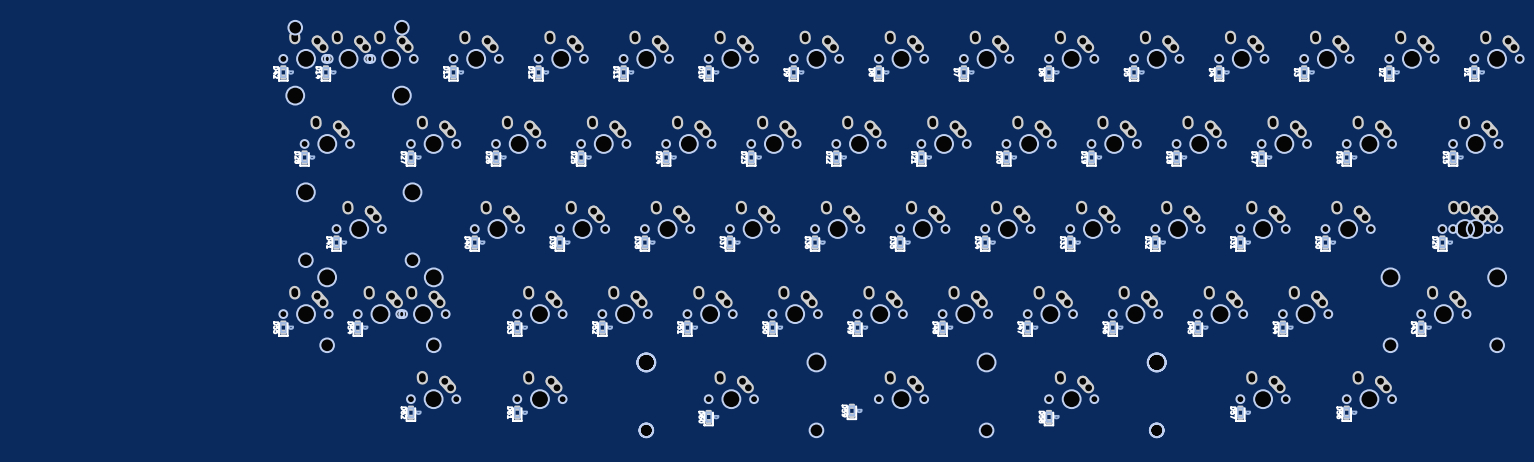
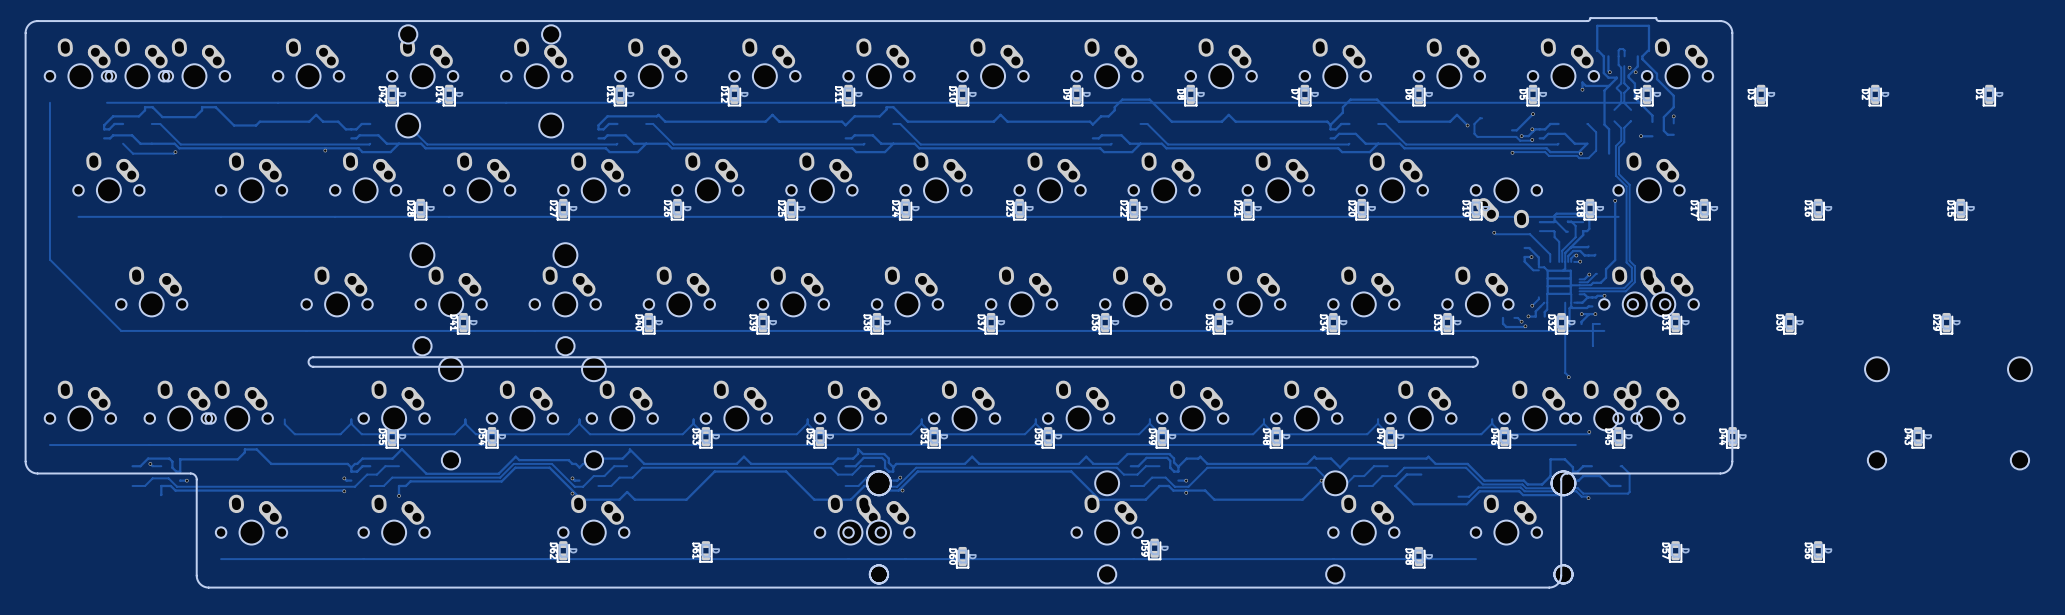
drawing: none -> [24, 17, 1734, 589]
track: none -> (1608, 56) (1609, 72)
track: none -> (1624, 56) (1624, 50) (1620, 49) (1618, 65) (1621, 67) (1621, 83) (1616, 88) (1621, 92) (1621, 103) (1614, 109)
track: none -> (1637, 56) (1637, 66) (1628, 77) (1634, 83) (1634, 98) (1652, 115) (1652, 121)
part: none -> (80, 63)
part: none -> (137, 63)
part: none -> (194, 63)
part: none -> (308, 63)
part: (348, 49) -> none
part: (1326, 49) -> none
part: (1411, 49) -> none
part: (1497, 49) -> none
track: none -> (1624, 66) (1624, 83) (1628, 87) (1624, 92) (1624, 103) (1631, 109)
via: none -> (1629, 67)
via: none -> (1609, 72)
via: none -> (1635, 72)
track: none -> (1609, 85) (1585, 85) (1582, 82) (1582, 89)
via: none -> (1582, 89)
track: none -> (49, 102) (49, 259) (121, 330) (1604, 330)
track: none -> (1647, 102) (107, 102)
track: none -> (1533, 114) (1516, 130) (1512, 130)
via: none -> (1533, 114)
track: none -> (1673, 116) (1673, 123)
via: none -> (1673, 116)
track: none -> (1482, 118) (1474, 123) (1474, 133) (1477, 136) (1516, 136) (1520, 140) (1532, 139)
track: none -> (1614, 121) (1621, 128) (1621, 140) (1615, 146) (1615, 175) (1626, 186) (1626, 262) (1631, 267) (1631, 280) (1624, 288) (1579, 288)
track: none -> (1631, 121) (1624, 127) (1624, 142) (1618, 147) (1618, 174) (1629, 184) (1629, 260) (1634, 266) (1634, 282) (1625, 291) (1579, 291)
track: none -> (151, 123) (160, 123) (180, 144) (370, 143)
track: none -> (370, 123) (361, 123) (356, 129) (345, 129) (338, 121) (323, 121) (316, 114) (309, 121) (259, 121) (256, 125) (234, 125) (215, 107) (202, 107) (202, 110) (195, 117) (162, 117) (152, 107) (145, 107) (145, 110) (138, 116) (113, 116) (104, 125) (104, 129) (109, 129) (114, 123) (123, 123)
track: none -> (398, 123) (406, 123) (427, 144) (617, 143)
track: none -> (617, 123) (608, 123) (603, 129) (598, 129) (598, 125) (607, 116) (658, 114) (665, 121) (765, 121) (772, 114) (779, 121) (842, 121) (845, 125) (854, 116) (879, 116) (886, 107) (893, 107) (907, 121) (993, 121) (1000, 114) (1007, 121) (1090, 121) (1092, 124) (1101, 116) (1108, 116) (1122, 99) (1149, 99) (1171, 121) (1221, 121) (1228, 114) (1235, 121) (1327, 121) (1330, 124)
track: none -> (646, 123) (653, 123) (673, 144) (864, 143)
track: none -> (893, 123) (900, 123) (920, 144) (1111, 143)
track: none -> (1140, 123) (1147, 123) (1167, 144) (1349, 143)
track: none -> (1349, 123) (1341, 123) (1335, 129) (1330, 129) (1330, 124)
track: none -> (1378, 123) (1385, 123) (1406, 144) (1558, 143)
track: none -> (1558, 123) (1550, 123) (1545, 129) (1535, 129) (1528, 136) (1521, 136)
track: none -> (1587, 123) (1596, 132) (1596, 150) (1588, 158) (1579, 158) (1577, 155) (1549, 155) (1545, 152) (1512, 152)
track: none -> (1330, 124) (1342, 112) (1342, 107) (1350, 99) (1377, 99) (1399, 121) (1450, 121) (1456, 114) (1467, 125)
via: none -> (1467, 125)
via: none -> (1532, 129)
track: none -> (1673, 134) (1667, 134) (1663, 130) (1663, 117) (1673, 107) (1673, 95) (1657, 79) (1657, 73) (1642, 59) (1642, 56) (1648, 50) (1648, 25) (1597, 25) (1597, 50) (1603, 56) (1603, 73) (1608, 77) (1616, 77) (1604, 90) (1604, 124) (1609, 129) (1609, 153)
via: none -> (1521, 136)
track: none -> (1641, 136) (1652, 136)
via: none -> (1641, 136)
track: none -> (104, 138) (110, 138) (113, 135) (132, 135) (140, 143) (174, 143) (179, 148) (358, 148) (362, 152) (390, 152) (398, 143)
track: none -> (351, 138) (356, 138) (359, 135) (378, 135) (386, 143) (421, 143) (425, 148) (605, 148) (609, 152) (637, 152) (646, 143)
track: none -> (598, 138) (604, 138) (607, 135) (625, 135) (634, 143) (667, 143) (672, 148) (852, 148) (856, 152) (884, 152) (893, 143)
track: none -> (845, 138) (851, 138) (854, 135) (872, 135) (881, 143) (914, 143) (919, 148) (1100, 148) (1104, 152) (1132, 152) (1140, 143)
track: none -> (1092, 138) (1098, 138) (1101, 135) (1121, 135) (1129, 143) (1161, 143) (1166, 148) (1338, 148) (1342, 152) (1369, 152) (1378, 143)
track: none -> (1330, 138) (1334, 138) (1339, 133) (1355, 133) (1365, 143) (1399, 143) (1404, 148) (1546, 148) (1550, 152) (1580, 153)
track: none -> (1539, 138) (1543, 138) (1548, 133) (1564, 133) (1574, 143) (1587, 143) (1578, 152)
via: none -> (1532, 139)
track: none -> (123, 143) (132, 153) (175, 152)
via: none -> (325, 150)
via: none -> (175, 152)
via: none -> (1512, 152)
via: none -> (1580, 153)
part: none -> (108, 177)
part: none -> (251, 177)
part: none -> (365, 177)
part position: (327, 134) -> (479, 177)
part rotation: 0° (1114, 134) -> 180° (1506, 203)
part position: (1199, 134) -> (1649, 177)
part: (1284, 134) -> none
part: (1369, 134) -> none
part: (1475, 134) -> none
track: none -> (1615, 200) (1615, 260) (1606, 269) (1606, 277) (1600, 282) (1593, 282) (1590, 285) (1547, 286)
via: none -> (1615, 200)
track: none -> (1618, 216) (78, 216)
track: none -> (1554, 221) (1539, 222)
track: none -> (1554, 221) (1567, 231)
track: none -> (1554, 221) (1556, 213) (1585, 213) (1589, 217) (1589, 228) (1583, 231) (1583, 235) (1565, 253) (1565, 268) (1563, 270)
track: none -> (1583, 222) (1568, 222) (1567, 221) (1571, 221) (1575, 225) (1575, 237) (1562, 250) (1562, 261)
track: none -> (1539, 231) (1554, 231) (1554, 237) (1559, 241) (1559, 261)
track: none -> (1494, 232) (1529, 234) (1550, 254) (1550, 261)
via: none -> (1494, 232)
track: none -> (1588, 246) (1571, 247)
track: none -> (1524, 248) (1529, 248) (1538, 257) (1538, 267) (1544, 267) (1547, 270)
track: none -> (1576, 255) (1571, 258) (1571, 261)
via: none -> (1576, 255)
track: none -> (1595, 254) (1584, 255) (1580, 250) (1573, 250) (1568, 256) (1568, 261)
track: none -> (1531, 256) (1524, 256) (1524, 261) (1533, 270) (1538, 270)
via: none -> (1531, 257)
track: none -> (1580, 261) (1574, 261)
via: none -> (1580, 261)
track: none -> (1547, 270) (1570, 270) (1570, 293)
track: none -> (1547, 270) (1547, 293)
track: none -> (1589, 274) (1584, 279) (1579, 279)
via: none -> (1589, 274)
track: none -> (1596, 273) (1587, 282) (1579, 282)
track: none -> (1570, 278) (1547, 278)
part: none -> (151, 291)
part: none -> (337, 291)
part: none -> (451, 291)
part: (359, 219) -> none
part: none -> (565, 291)
part: (1177, 219) -> none
part: none -> (1634, 291)
part: none -> (1663, 291)
part: (1263, 219) -> none
part: (1348, 219) -> none
part: (1465, 219) -> none
part: (1475, 219) -> none
track: none -> (1547, 293) (1547, 309) (1544, 312) (1544, 316)
track: none -> (1570, 293) (1571, 306)
track: none -> (1570, 293) (1547, 293)
track: none -> (1579, 294) (1584, 294) (1587, 297)
track: none -> (1604, 295) (1587, 297)
via: none -> (1604, 295)
track: none -> (1538, 297) (1532, 305)
track: none -> (1587, 297) (1582, 302) (1574, 302)
track: none -> (1544, 302) (1535, 311) (1535, 316) (1528, 316)
track: none -> (1565, 302) (1565, 372) (1568, 377)
via: none -> (1532, 305)
track: none -> (1571, 306) (1569, 308) (1569, 326)
track: none -> (1592, 306) (1587, 308) (1571, 306)
via: none -> (1581, 314)
track: none -> (1589, 314) (1581, 323)
track: none -> (1595, 314) (1581, 314)
via: none -> (1595, 314)
via: none -> (1528, 316)
track: none -> (1503, 317) (1503, 323) (1506, 327) (1525, 326)
track: none -> (1514, 317) (1517, 317) (1521, 321)
via: none -> (1521, 321)
track: none -> (1599, 323) (1592, 323) (1593, 346)
via: none -> (1525, 326)
board edge: none -> (1473, 357) (313, 357) (308, 362) (313, 366) (1473, 366) (1477, 362) (1473, 357)
via: none -> (1568, 377)
part: none -> (80, 405)
part: none -> (180, 405)
part: none -> (237, 405)
part position: (306, 304) -> (394, 405)
part position: (422, 304) -> (622, 405)
part: none -> (1606, 405)
part: (1305, 304) -> none
part: (1443, 304) -> none
track: none -> (284, 419) (284, 424) (294, 434) (340, 434) (351, 423)
track: none -> (351, 419) (351, 423) (361, 434) (454, 434) (465, 423)
track: none -> (465, 419) (465, 423) (475, 434) (568, 434) (579, 423)
track: none -> (579, 419) (579, 423) (589, 434) (682, 434) (693, 423)
track: none -> (693, 419) (693, 423) (704, 434) (796, 434) (807, 423)
track: none -> (807, 419) (807, 423) (818, 434) (910, 434) (921, 423)
track: none -> (921, 419) (921, 423) (932, 434) (1024, 434) (1035, 423)
track: none -> (1035, 419) (1035, 423) (1046, 434) (1139, 434) (1149, 423)
track: none -> (1149, 419) (1149, 423) (1160, 434) (1253, 434) (1263, 423)
track: none -> (1263, 419) (1263, 423) (1274, 434) (1367, 434) (1378, 423)
track: none -> (1378, 419) (1378, 423) (1388, 434) (1481, 434) (1492, 423)
track: none -> (1492, 419) (1492, 423) (1502, 434) (1589, 434) (1589, 431)
via: none -> (1589, 431)
track: none -> (1575, 445) (49, 445)
track: none -> (150, 463) (152, 466) (161, 466)
via: none -> (150, 463)
track: none -> (132, 466) (140, 466) (148, 458) (169, 458) (172, 461) (172, 467) (176, 471) (180, 471) (180, 459) (237, 459) (244, 452) (244, 449) (256, 449) (271, 463) (347, 463) (351, 467)
track: none -> (370, 466) (362, 466) (357, 471) (351, 471) (351, 467)
track: none -> (398, 466) (385, 466) (377, 474) (367, 474) (354, 486) (176, 486) (168, 478) (152, 478) (145, 485) (132, 485)
track: none -> (627, 466) (614, 466) (604, 476) (593, 476) (583, 486) (574, 486) (551, 463) (513, 463) (500, 477) (392, 477) (383, 485) (370, 485)
track: none -> (845, 466) (855, 466) (863, 457) (882, 457) (885, 460) (885, 467) (888, 471) (893, 471) (893, 467)
track: none -> (874, 466) (860, 466) (852, 474) (837, 474) (831, 467) (642, 467) (632, 477) (619, 477) (611, 485) (598, 485)
track: none -> (1130, 466) (1138, 466) (1146, 457) (1167, 457) (1170, 460) (1170, 467) (1174, 471) (1178, 471) (1178, 466)
track: none -> (1159, 466) (1145, 466) (1137, 474) (1123, 474) (1117, 467) (916, 467) (897, 486) (889, 486) (880, 477) (866, 477) (858, 485) (845, 485)
track: none -> (1387, 466) (1374, 466) (1364, 476) (1354, 476) (1343, 486) (1334, 486) (1315, 467) (1207, 467) (1188, 486) (1174, 486) (1165, 477) (1152, 477) (1143, 485) (1130, 485)
track: none -> (1591, 466) (1583, 466) (1577, 471) (1572, 471) (1572, 467) (1564, 459) (1550, 459) (1550, 476) (1542, 484) (1527, 484) (1523, 480) (1484, 480) (1467, 463) (1435, 463) (1428, 456) (1426, 458) (1348, 458) (1340, 467) (1331, 458) (1316, 458) (1314, 456) (1307, 463) (1207, 463) (1200, 456) (1198, 458) (1186, 458) (1178, 466)
track: none -> (1620, 466) (1629, 473) (1628, 493) (1583, 493) (1577, 488) (1526, 488) (1522, 484) (1482, 484) (1466, 467) (1404, 467) (1396, 476) (1382, 476) (1372, 485) (1358, 485)
track: none -> (893, 467) (884, 454) (862, 454) (858, 449) (858, 453) (853, 458) (837, 458) (832, 463) (751, 463) (743, 456) (736, 463) (644, 463) (629, 449) (622, 458) (590, 458) (579, 467) (568, 460) (519, 460) (515, 456) (498, 473) (426, 473) (401, 449) (392, 458) (362, 458) (351, 467)
track: none -> (1178, 466) (1169, 454) (1127, 454) (1117, 463) (1093, 463) (1086, 456) (1078, 463) (979, 463) (972, 456) (964, 463) (896, 463) (893, 467)
track: none -> (1421, 474) (1406, 474) (1395, 485) (1413, 504) (1466, 504) (1479, 491) (1519, 491) (1523, 495) (1564, 495)
track: none -> (344, 478) (351, 480)
via: none -> (344, 478)
track: none -> (572, 478) (579, 480)
via: none -> (572, 478)
track: none -> (900, 477) (897, 480) (893, 480)
via: none -> (900, 477)
track: none -> (186, 480) (180, 480)
via: none -> (186, 480)
track: none -> (1186, 480) (1178, 480)
via: none -> (1186, 480)
track: none -> (1321, 480) (1302, 499) (1214, 499) (1205, 490) (1173, 490) (1168, 485) (1159, 485) (1145, 499) (1099, 499) (1071, 471) (917, 471) (898, 490) (886, 490) (882, 485) (864, 485) (850, 499) (814, 499) (786, 471) (714, 471) (686, 499) (634, 499) (627, 491) (619, 499) (581, 499) (549, 467) (515, 467) (501, 481) (410, 481) (405, 485) (398, 485) (398, 495)
via: none -> (1321, 480)
track: none -> (1565, 480) (1578, 480) (1583, 476) (1599, 476) (1609, 485) (1620, 485)
via: none -> (902, 490)
track: none -> (344, 491) (175, 490) (170, 485) (161, 485) (161, 495)
via: none -> (344, 491)
via: none -> (1186, 492)
via: none -> (572, 493)
via: none -> (399, 495)
track: none -> (1458, 496) (1469, 496) (1478, 487) (1520, 487) (1524, 491) (1576, 491) (1581, 496) (1588, 498)
via: none -> (1588, 498)
part: none -> (251, 519)
part: none -> (394, 519)
part: (539, 389) -> none
part: none -> (850, 519)
part: none -> (878, 519)
part: (731, 389) -> none
part: none -> (1107, 519)
part: (901, 389) -> none
part: none -> (1363, 519)
part: (1071, 389) -> none
part: none -> (1506, 519)
part: (1263, 389) -> none
part: (1369, 389) -> none
track: none -> (1475, 559) (221, 559)

